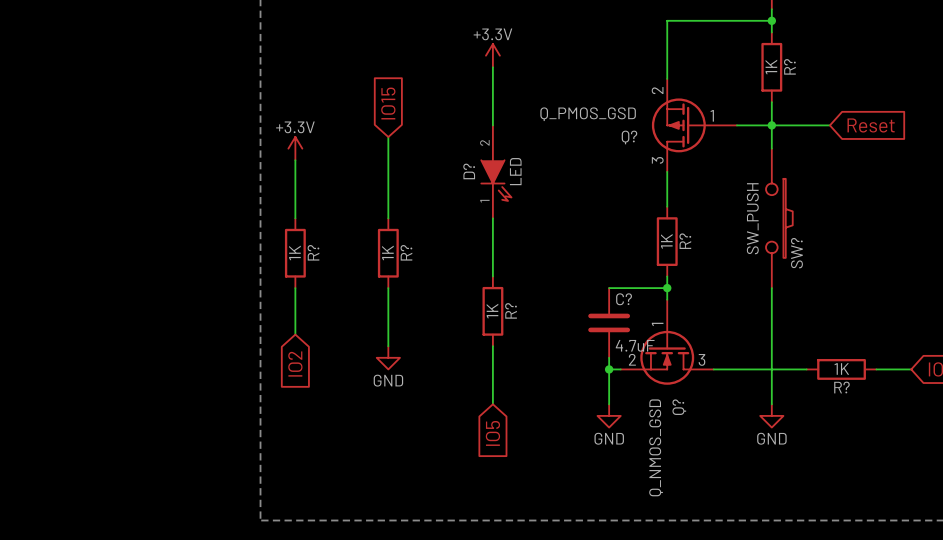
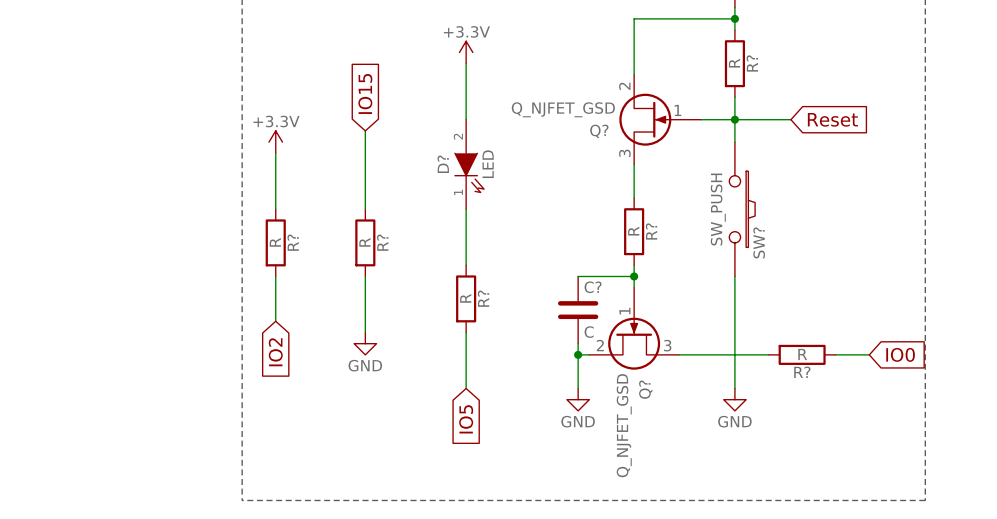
R? value: 1K (771, 67) -> R (734, 63)
Q? symbol: [651, 78, 737, 172] -> [619, 74, 702, 165]
Q? value: Q_PMOS_GSD (588, 114) -> Q_NJFET_GSD (563, 109)
R? value: 1K (666, 241) -> R (633, 231)
R? value: 1K (294, 252) -> R (275, 242)
R? value: 1K (387, 252) -> R (364, 242)
Q? symbol: [620, 299, 714, 385] -> [589, 287, 679, 370]
R? value: 1K (492, 311) -> R (465, 298)
C? value: 4.7uF (635, 345) -> C (589, 332)
R? value: 1K (841, 369) -> R (802, 354)
Q? value: Q_NMOS_GSD (656, 447) -> Q_NJFET_GSD (624, 425)

